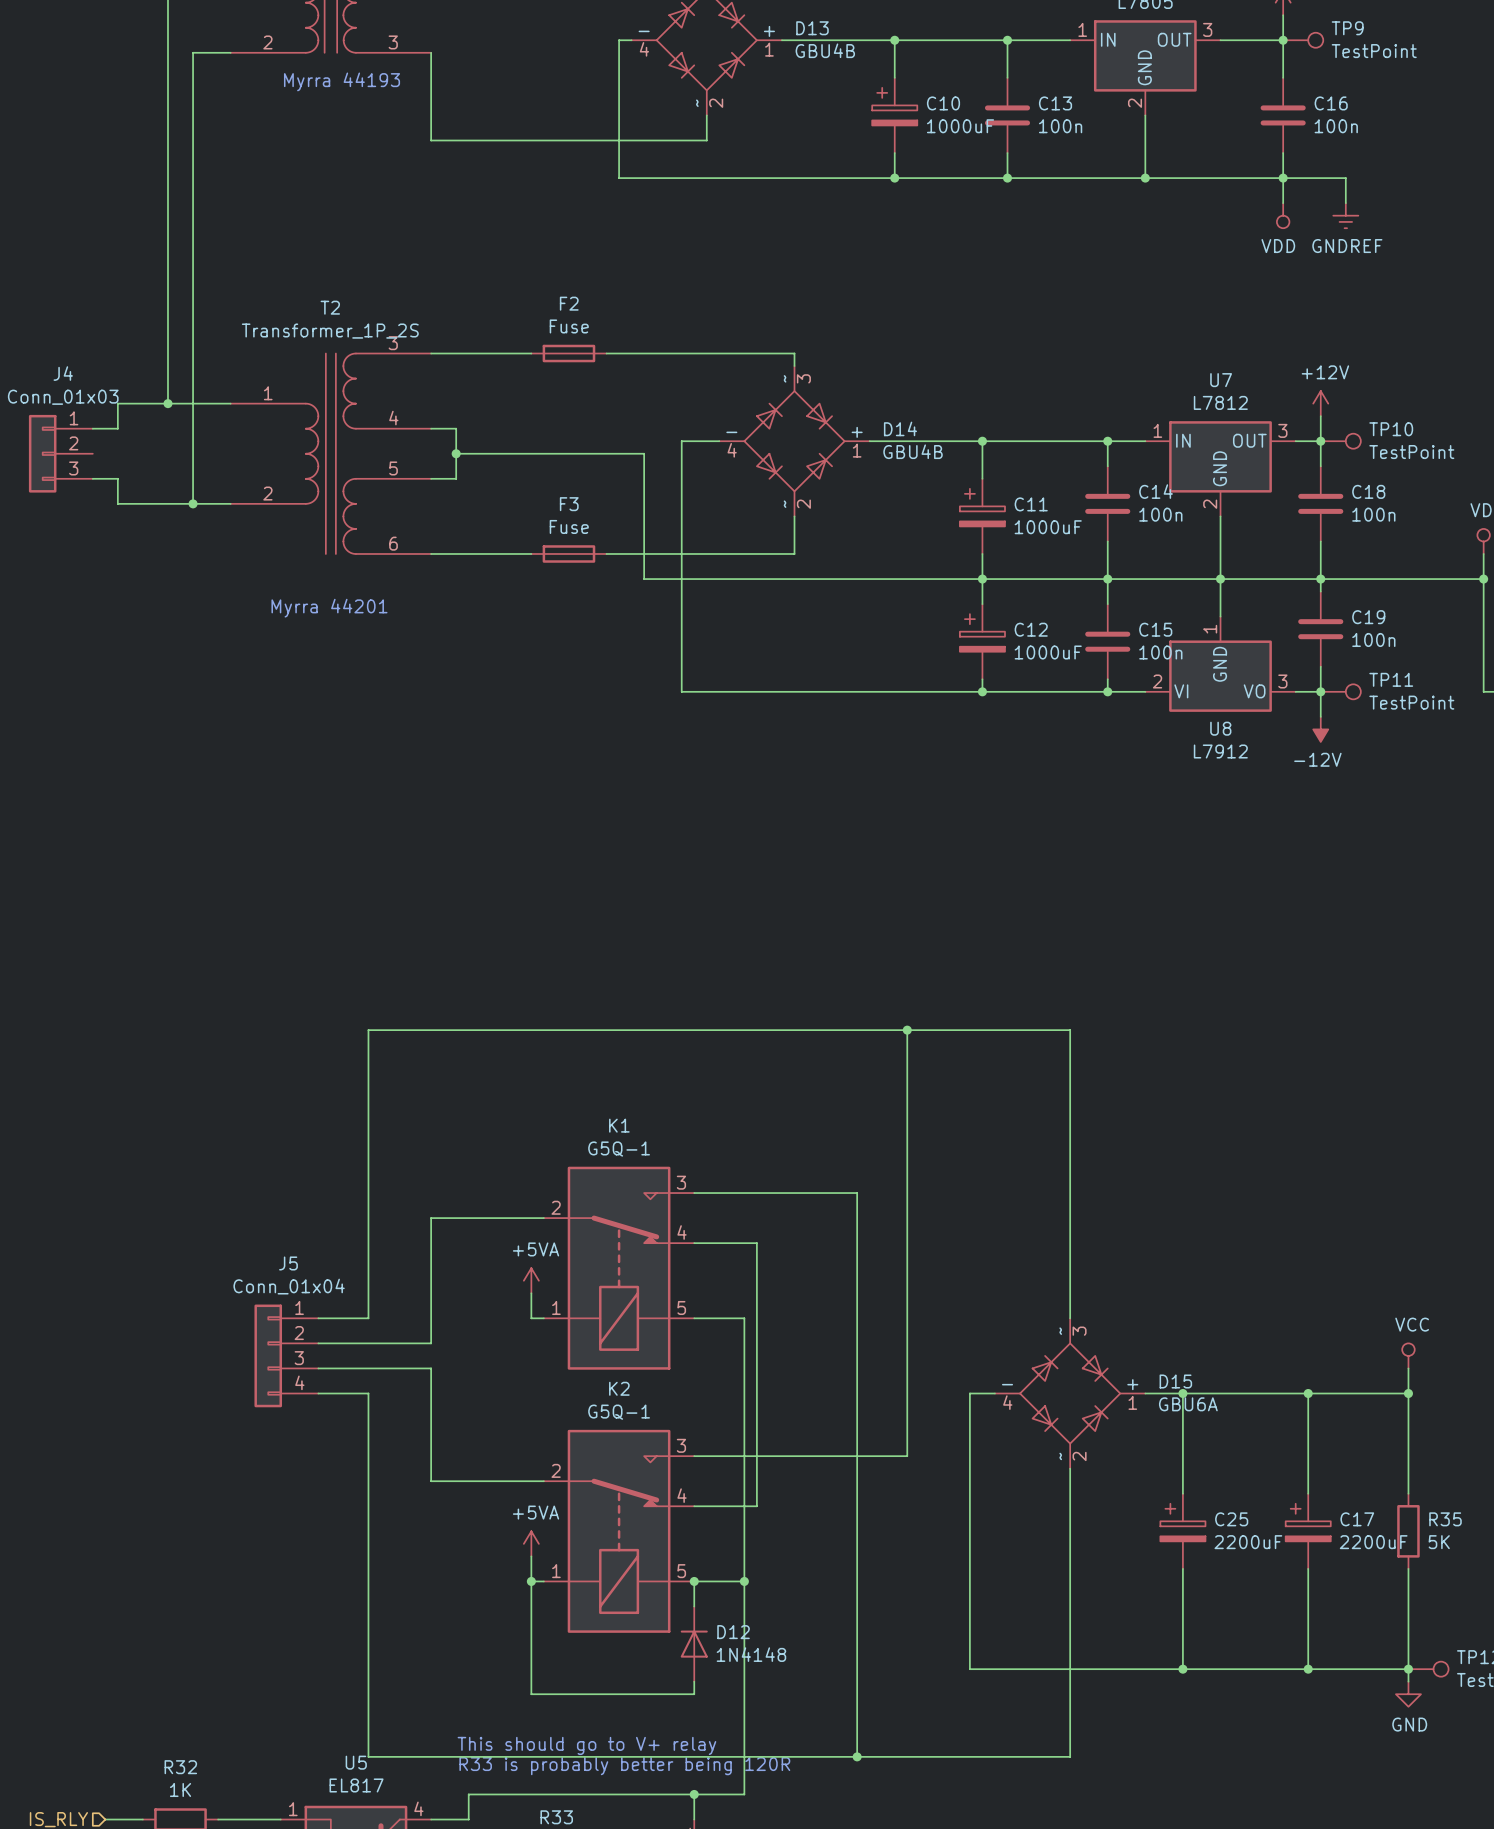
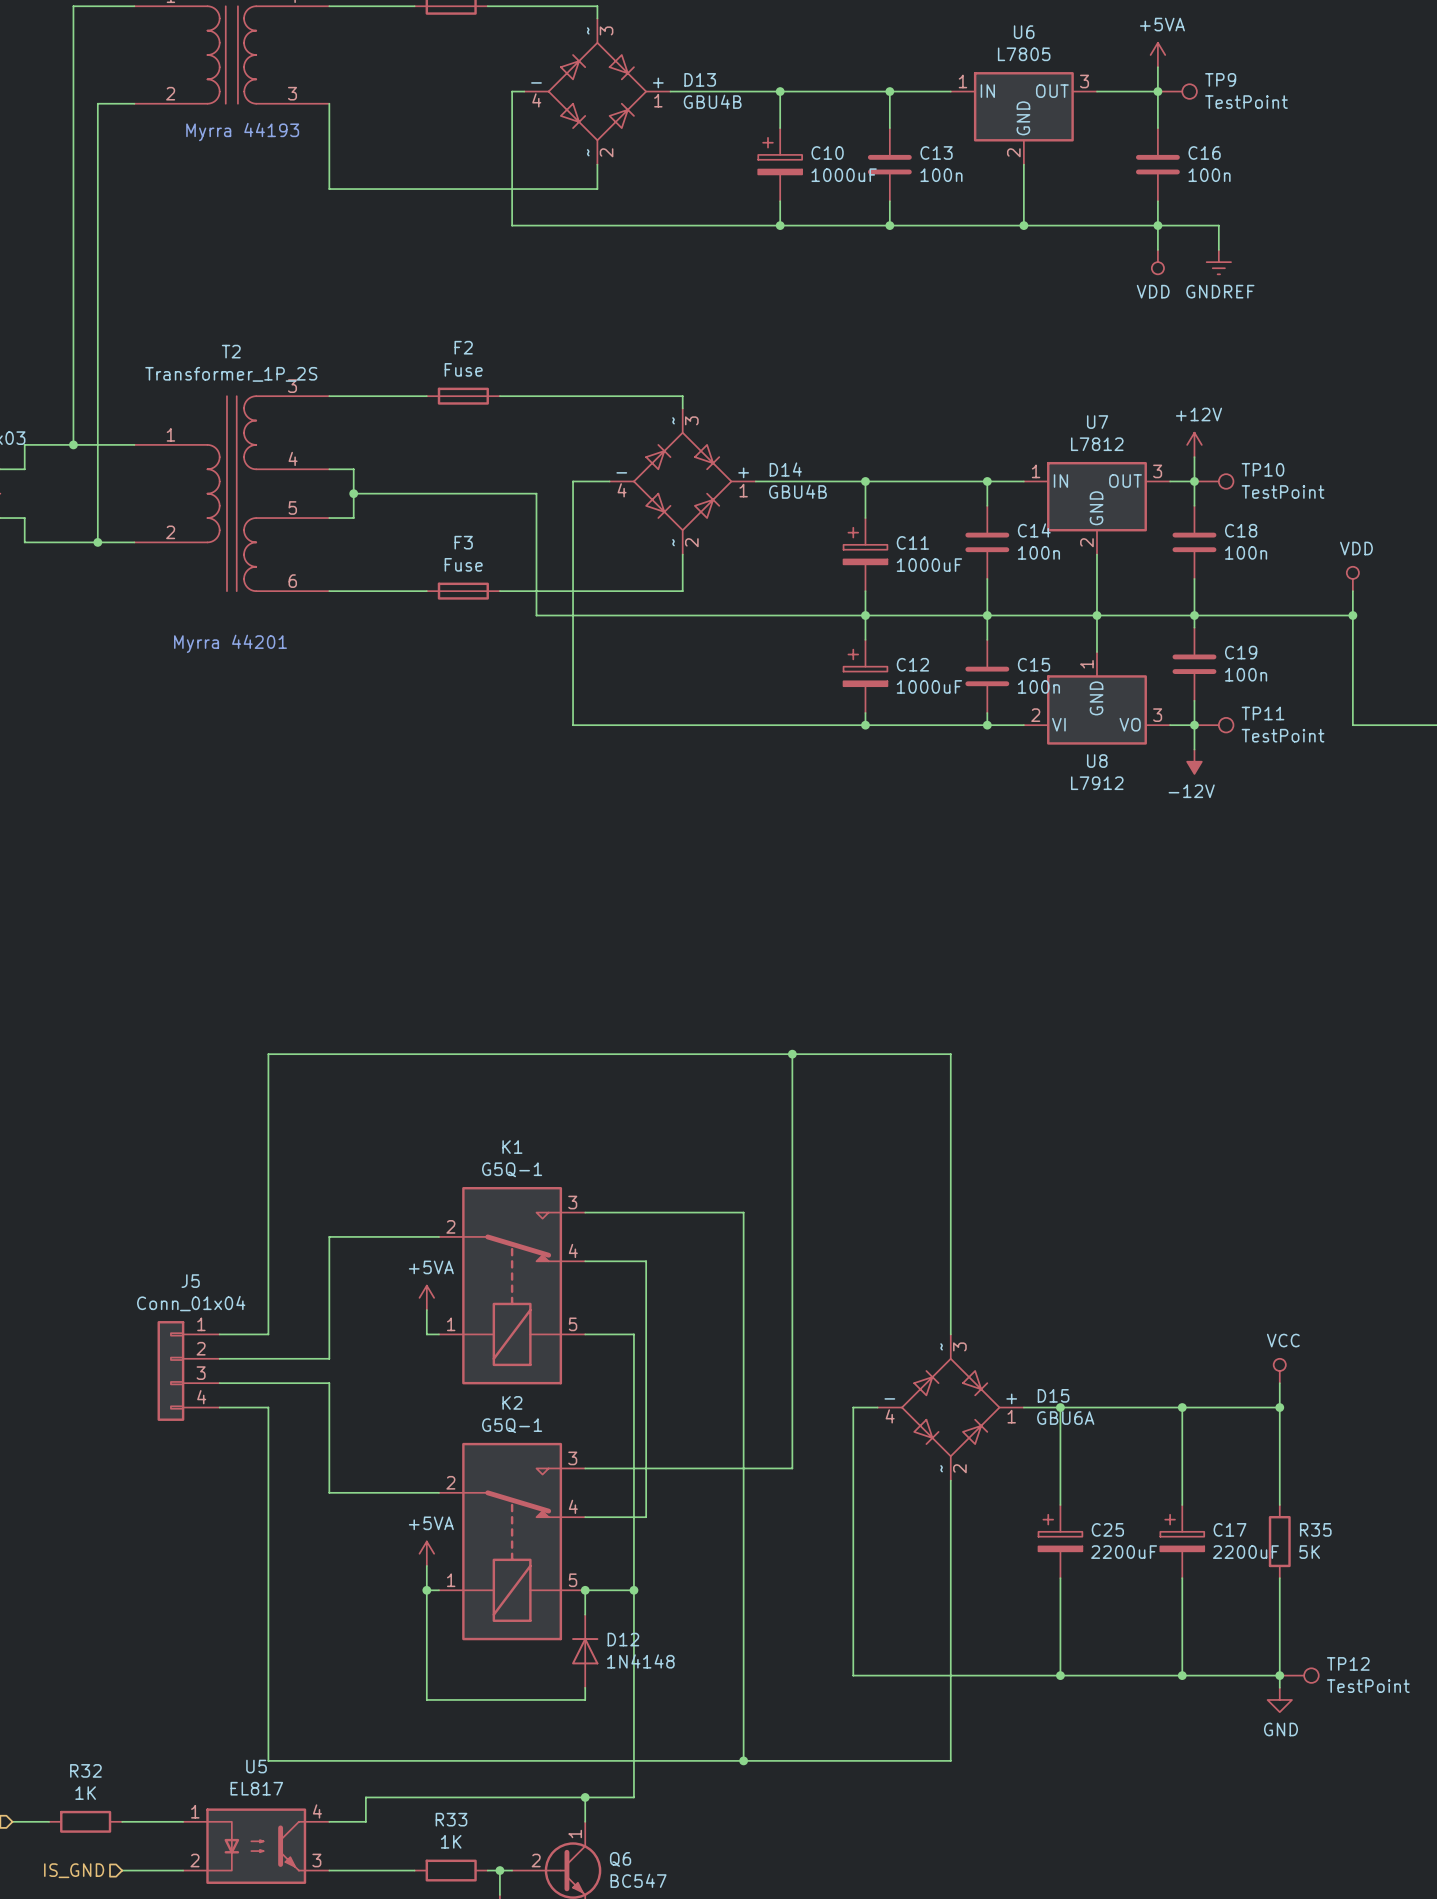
text: This should go to V+ relay (586, 1745) -> none
text: R33 is probably better being 120R (624, 1766) -> none

